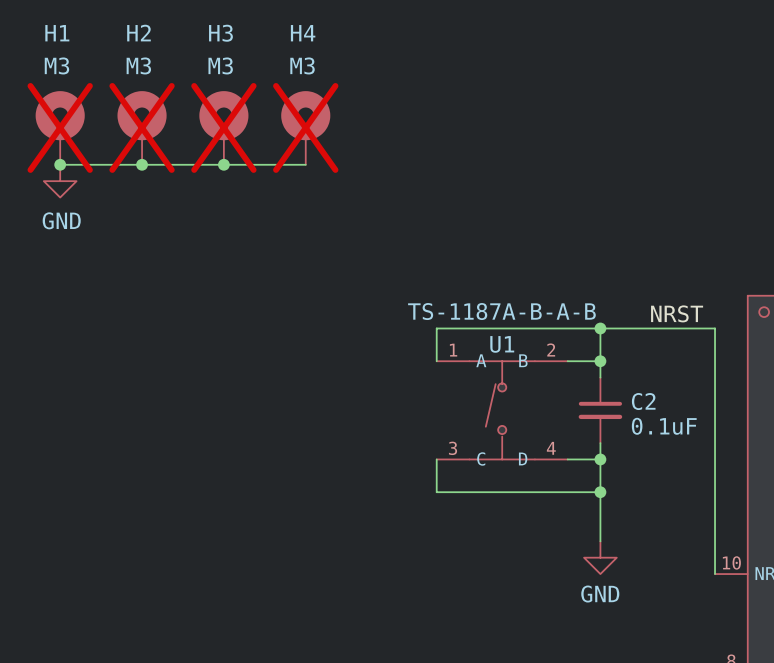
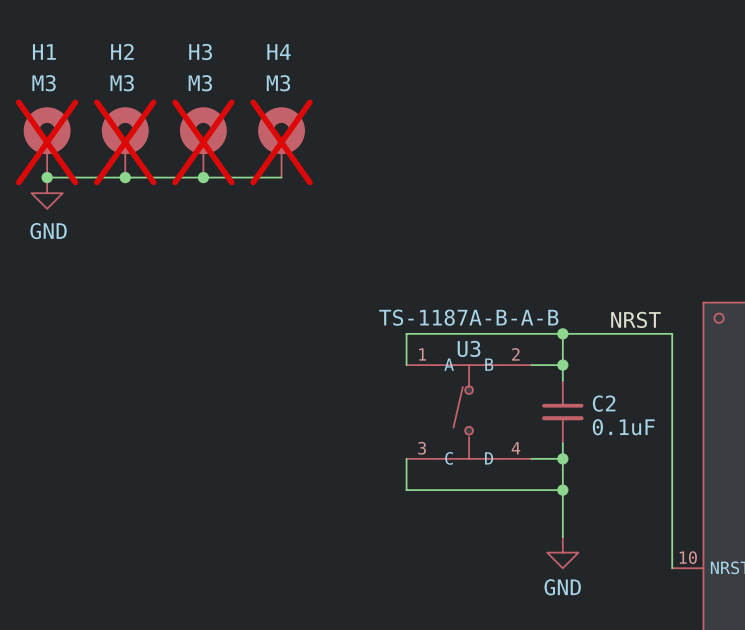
U1 name: U1 (502, 344) -> U3 (469, 348)

